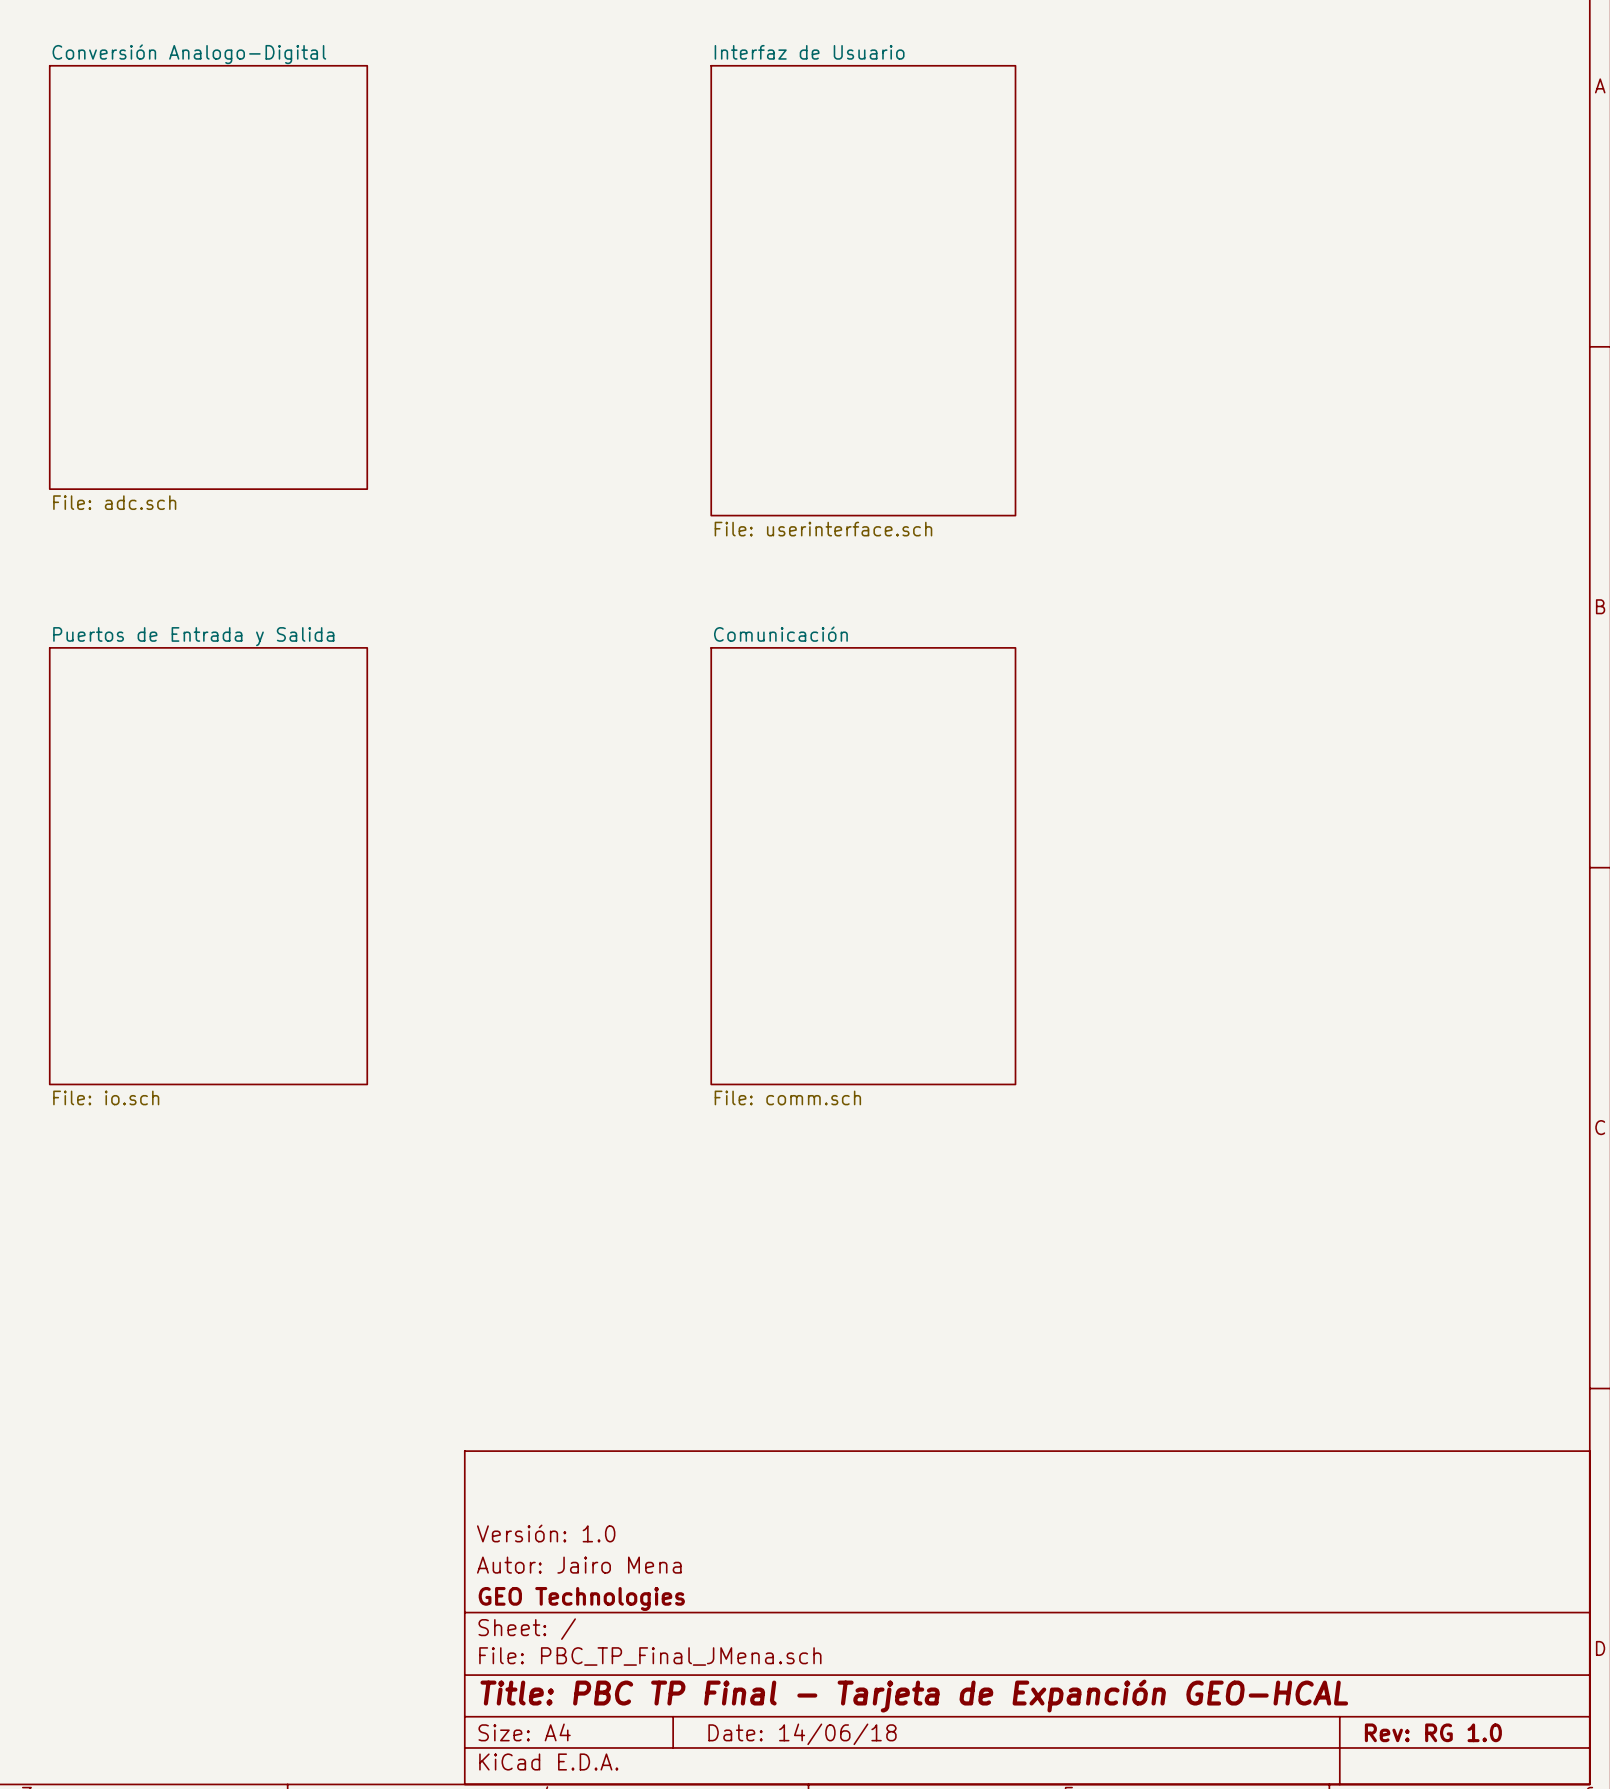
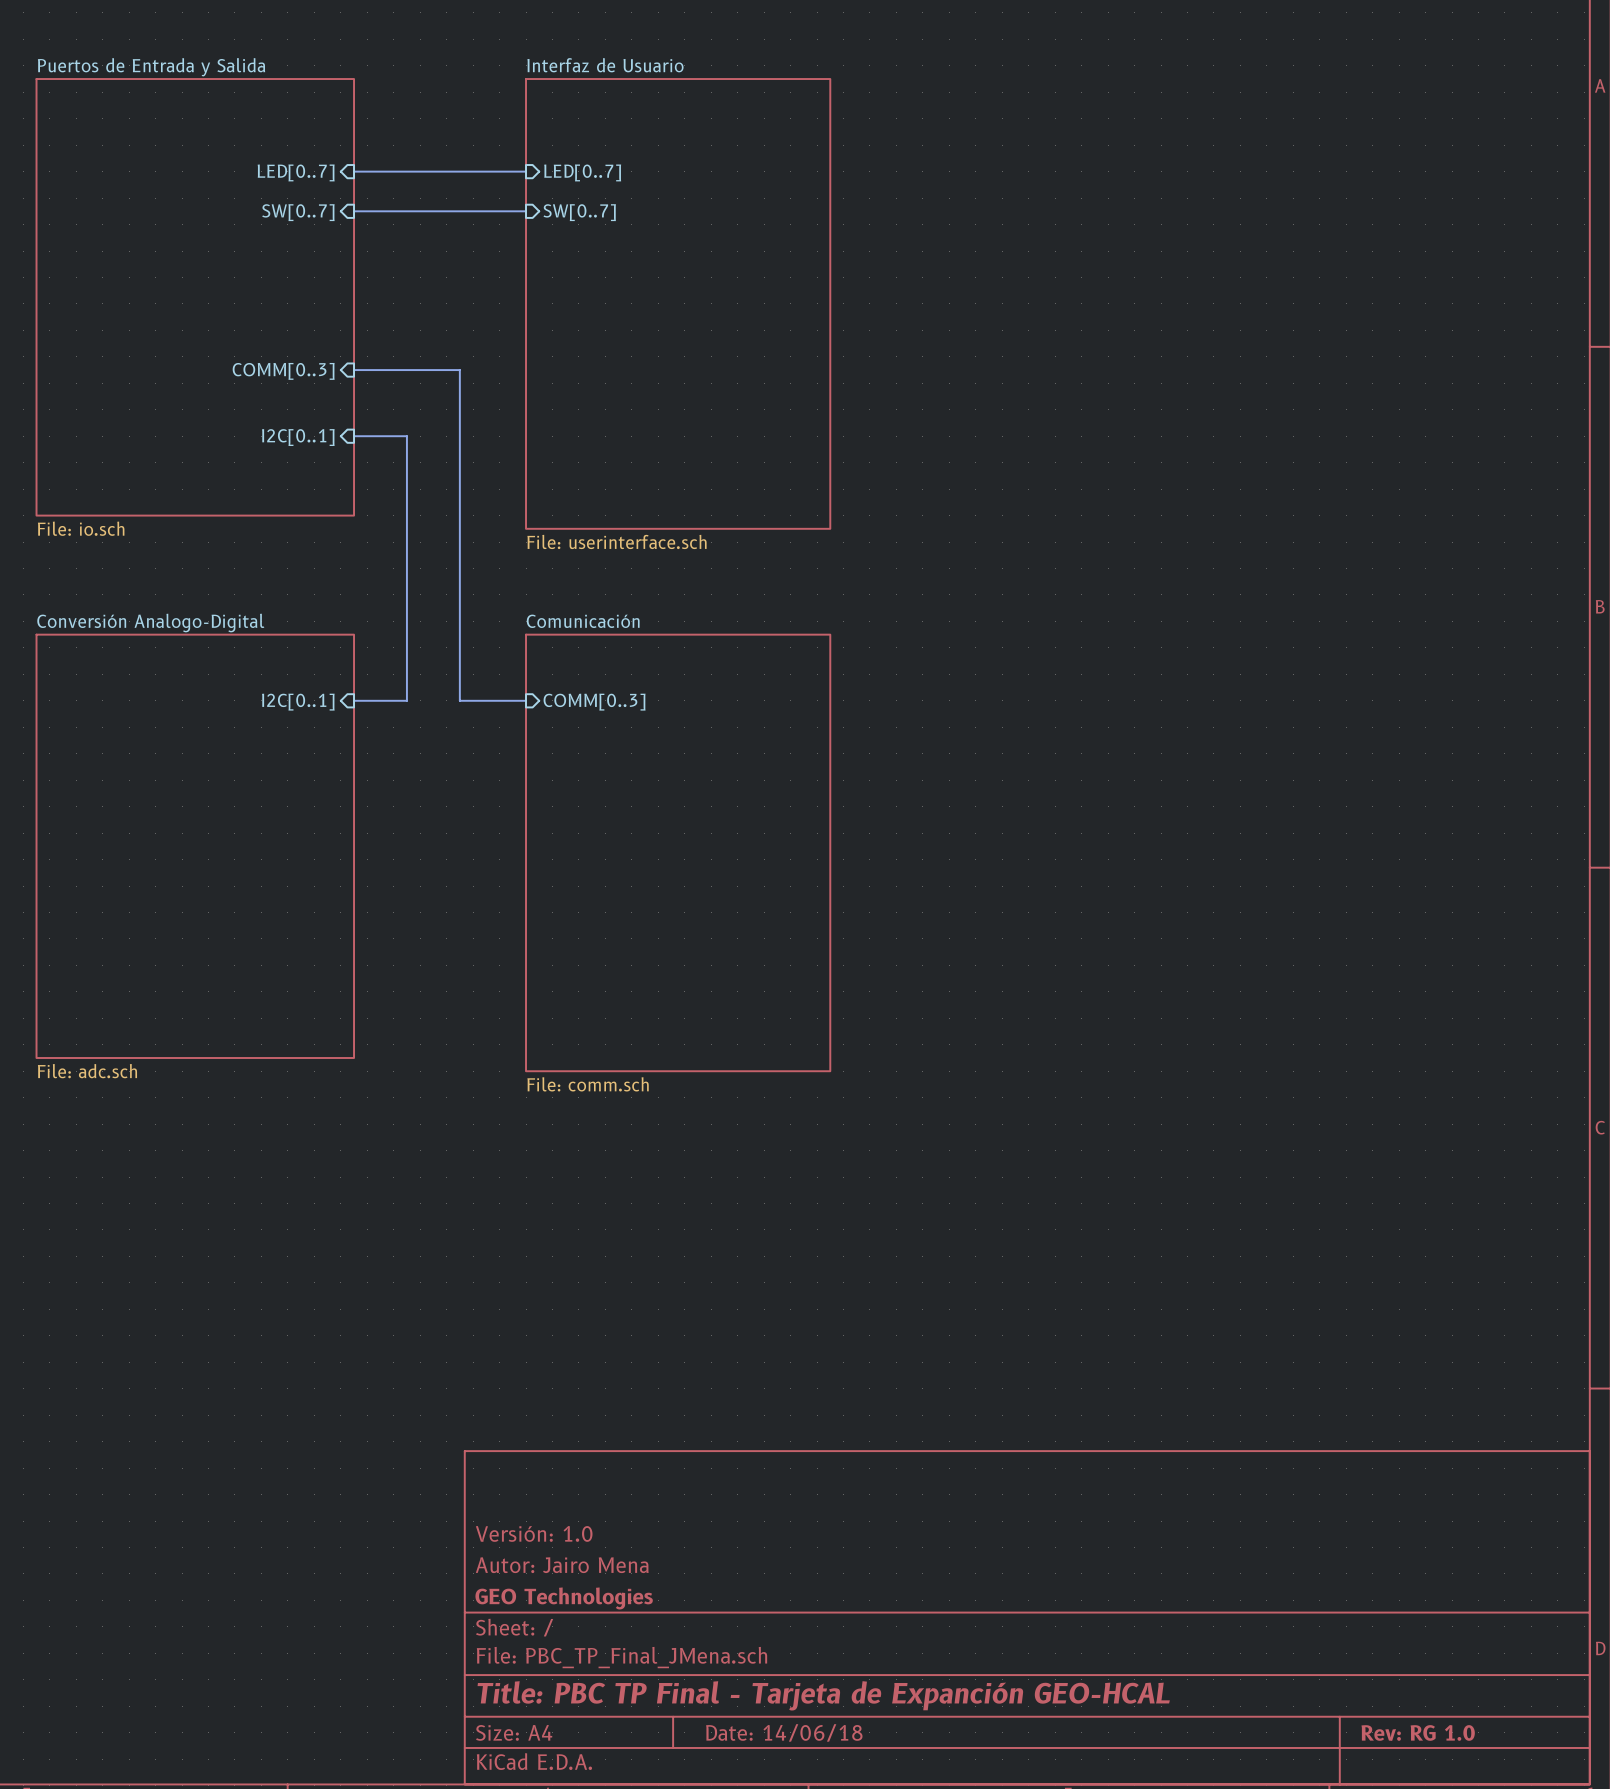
bus: none -> (354, 171) (526, 171)
sheet pin: none -> LED[0..7] (296, 172)
sheet pin: none -> LED[0..7] (582, 172)
bus: none -> (354, 211) (526, 211)
sheet pin: none -> SW[0..7] (298, 212)
sheet pin: none -> SW[0..7] (579, 212)
sheet Conversión Analogo-Digital: File: adc.sch (208, 277) -> none
sheet Interfaz de Usuario position: (863, 290) -> (678, 303)
sheet Puertos de Entrada y Salida: none -> File: io.sch (195, 297)
bus: none -> (354, 370) (459, 370) (459, 700) (526, 700)
sheet pin: none -> COMM[0..3] (283, 371)
bus: none -> (354, 436) (406, 436) (406, 700) (354, 700)
sheet pin: none -> I2C[0..1] (298, 437)
sheet pin: none -> I2C[0..1] (298, 702)
sheet pin: none -> COMM[0..3] (594, 702)
sheet Conversión Analogo-Digital: none -> File: adc.sch (195, 846)
sheet Puertos de Entrada y Salida: File: io.sch (208, 866) -> none
sheet Comunicación position: (863, 866) -> (678, 852)

